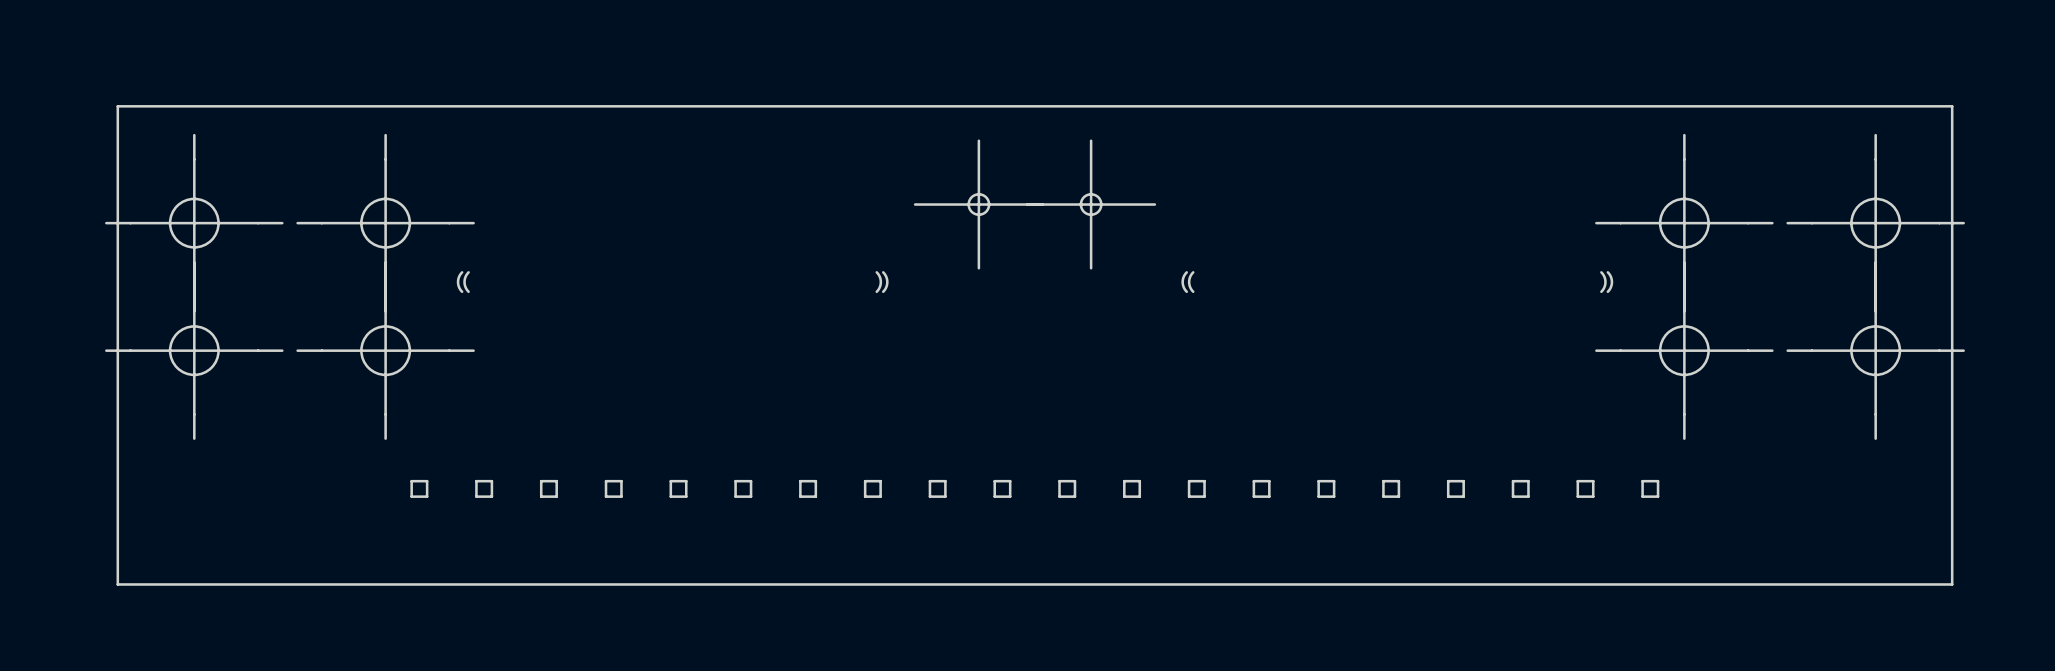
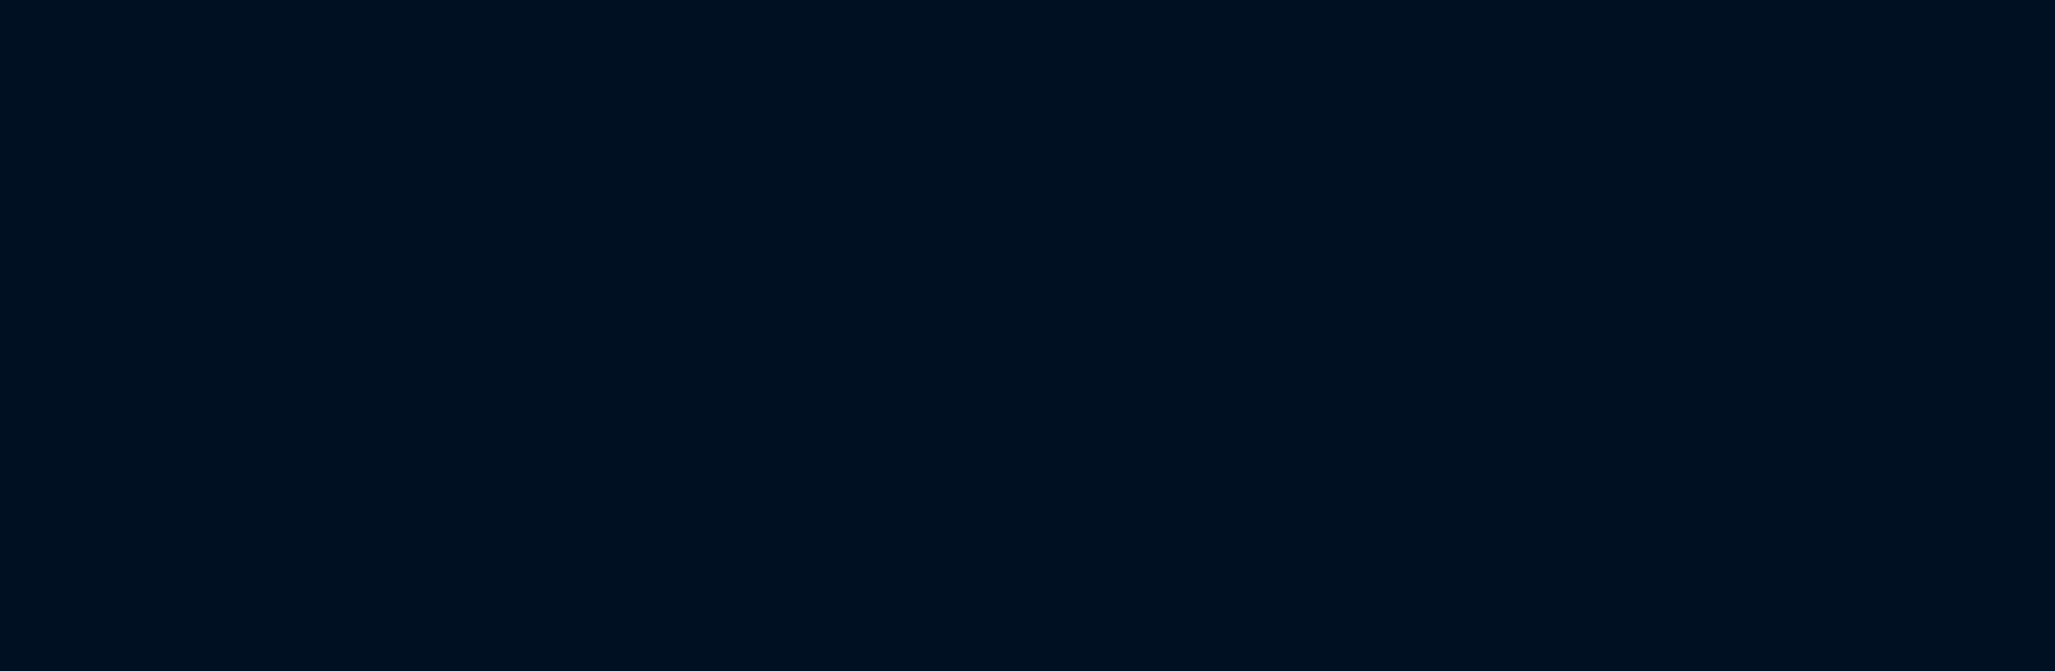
board edge: (117, 106) (117, 584) (1952, 584) (1952, 106) (117, 106) -> none
board edge: (194, 135) (194, 438) -> none
board edge: (385, 135) (385, 438) -> none
board edge: (1684, 135) (1684, 438) -> none
board edge: (1875, 135) (1875, 438) -> none
board edge: (978, 140) (978, 268) -> none
board edge: (1091, 140) (1091, 268) -> none
round board edge: [967, 193, 991, 216] -> none
round board edge: [1079, 193, 1103, 216] -> none
round board edge: [168, 197, 220, 249] -> none
round board edge: [360, 197, 412, 249] -> none
round board edge: [1658, 197, 1710, 249] -> none
round board edge: [1850, 197, 1902, 249] -> none
board edge: (915, 204) (1154, 204) -> none
board edge: (106, 223) (282, 223) -> none
board edge: (297, 223) (473, 223) -> none
board edge: (1596, 223) (1772, 223) -> none
board edge: (1787, 223) (1963, 223) -> none
board edge: (462, 272) (458, 282) (462, 291) -> none
board edge: (468, 272) (464, 282) (468, 291) -> none
board edge: (876, 272) (880, 282) (876, 291) -> none
board edge: (883, 272) (887, 282) (883, 291) -> none
board edge: (1186, 272) (1182, 282) (1186, 291) -> none
board edge: (1193, 272) (1189, 282) (1193, 291) -> none
board edge: (1601, 272) (1605, 282) (1601, 291) -> none
board edge: (1607, 272) (1611, 282) (1607, 291) -> none
round board edge: [168, 325, 220, 377] -> none
round board edge: [360, 325, 412, 377] -> none
round board edge: [1658, 325, 1710, 377] -> none
round board edge: [1850, 325, 1902, 377] -> none
board edge: (106, 350) (282, 350) -> none
board edge: (297, 350) (473, 350) -> none
board edge: (1596, 350) (1772, 350) -> none
board edge: (1787, 350) (1963, 350) -> none
board edge: (411, 481) (427, 481) (427, 496) (411, 496) (411, 481) -> none
board edge: (476, 481) (491, 481) (491, 496) (476, 496) (476, 481) -> none
board edge: (541, 481) (556, 481) (556, 496) (541, 496) (541, 481) -> none
board edge: (606, 481) (621, 481) (621, 496) (606, 496) (606, 481) -> none
board edge: (670, 481) (686, 481) (686, 496) (670, 496) (670, 481) -> none
board edge: (735, 481) (751, 481) (751, 496) (735, 496) (735, 481) -> none
board edge: (800, 481) (815, 481) (815, 496) (800, 496) (800, 481) -> none
board edge: (865, 481) (880, 481) (880, 496) (865, 496) (865, 481) -> none
board edge: (929, 481) (945, 481) (945, 496) (929, 496) (929, 481) -> none
board edge: (994, 481) (1010, 481) (1010, 496) (994, 496) (994, 481) -> none
board edge: (1059, 481) (1074, 481) (1074, 496) (1059, 496) (1059, 481) -> none
board edge: (1124, 481) (1139, 481) (1139, 496) (1124, 496) (1124, 481) -> none
board edge: (1189, 481) (1204, 481) (1204, 496) (1189, 496) (1189, 481) -> none
board edge: (1253, 481) (1269, 481) (1269, 496) (1253, 496) (1253, 481) -> none
board edge: (1318, 481) (1334, 481) (1334, 496) (1318, 496) (1318, 481) -> none
board edge: (1383, 481) (1398, 481) (1398, 496) (1383, 496) (1383, 481) -> none
board edge: (1448, 481) (1463, 481) (1463, 496) (1448, 496) (1448, 481) -> none
board edge: (1513, 481) (1528, 481) (1528, 496) (1513, 496) (1513, 481) -> none
board edge: (1577, 481) (1593, 481) (1593, 496) (1577, 496) (1577, 481) -> none
board edge: (1642, 481) (1658, 481) (1658, 496) (1642, 496) (1642, 481) -> none

